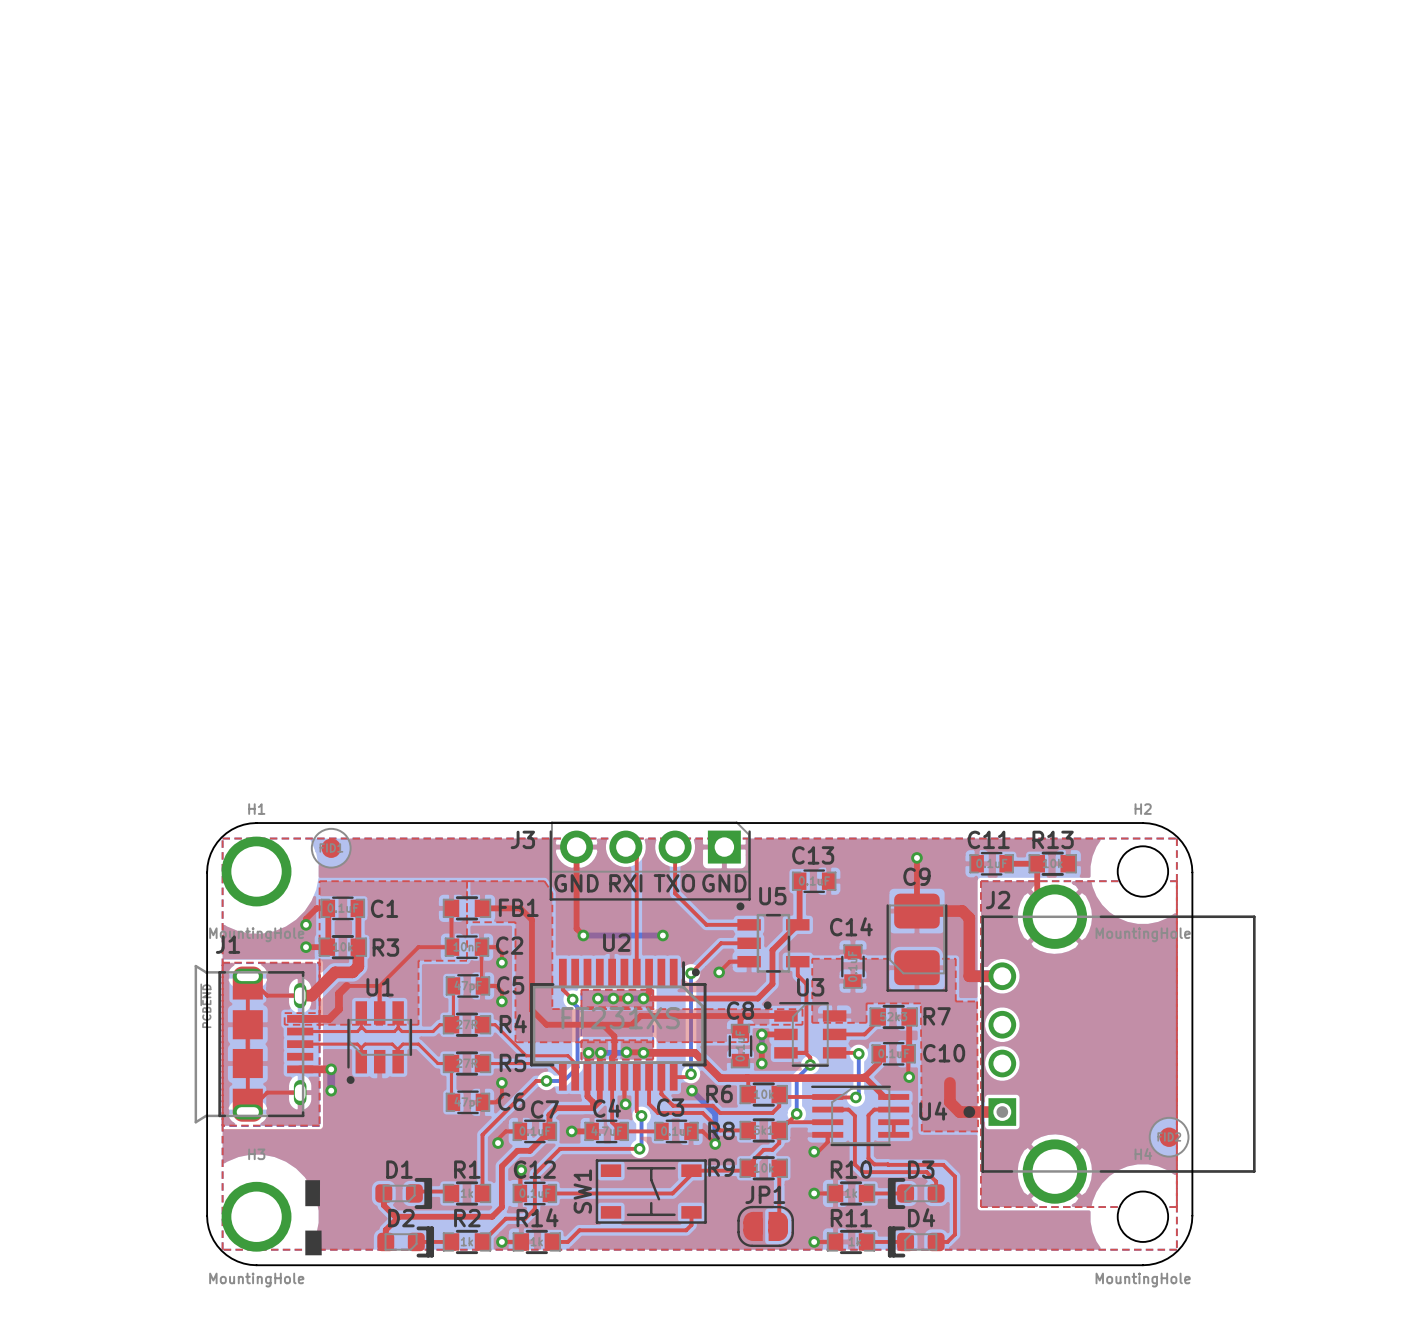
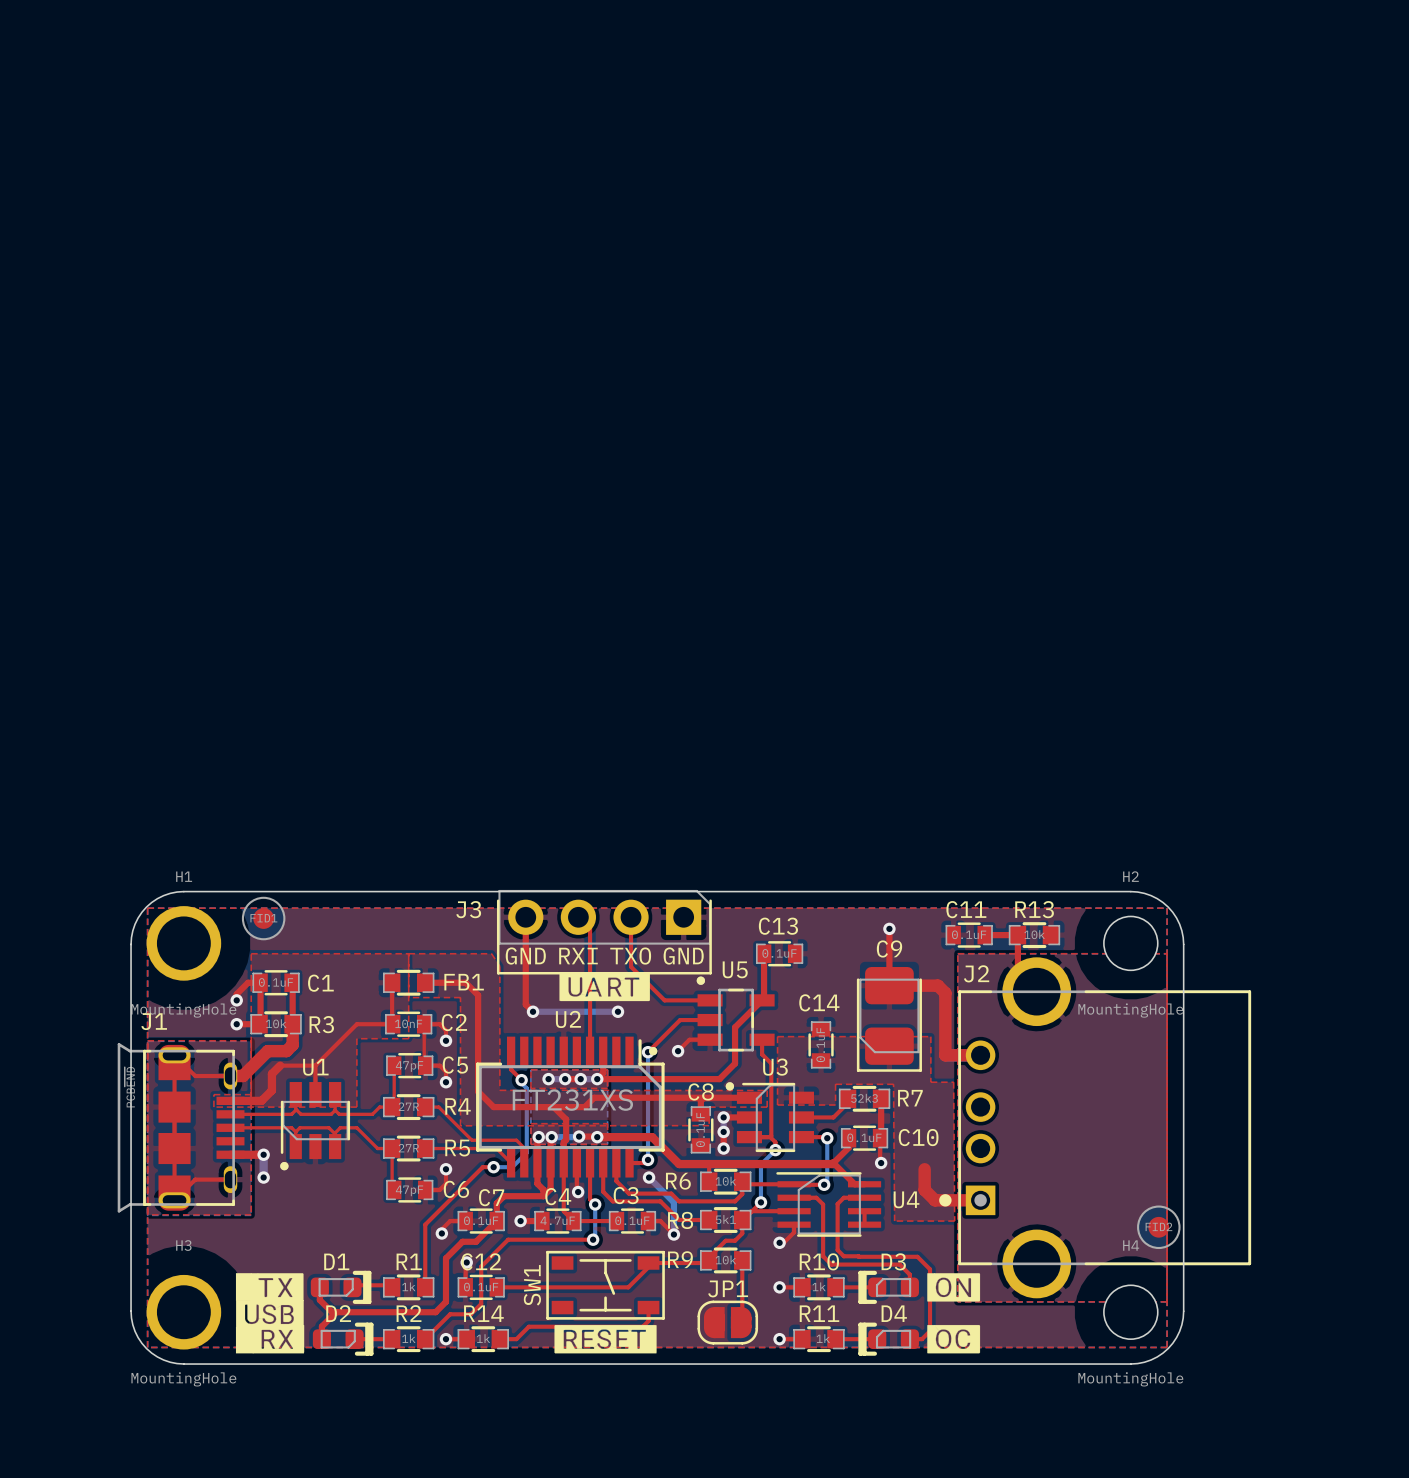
drawing: none -> [559, 972, 650, 1002]
drawing: none -> [235, 1273, 305, 1354]
drawing: none -> [927, 1273, 981, 1354]
drawing: none -> [554, 1324, 657, 1354]

